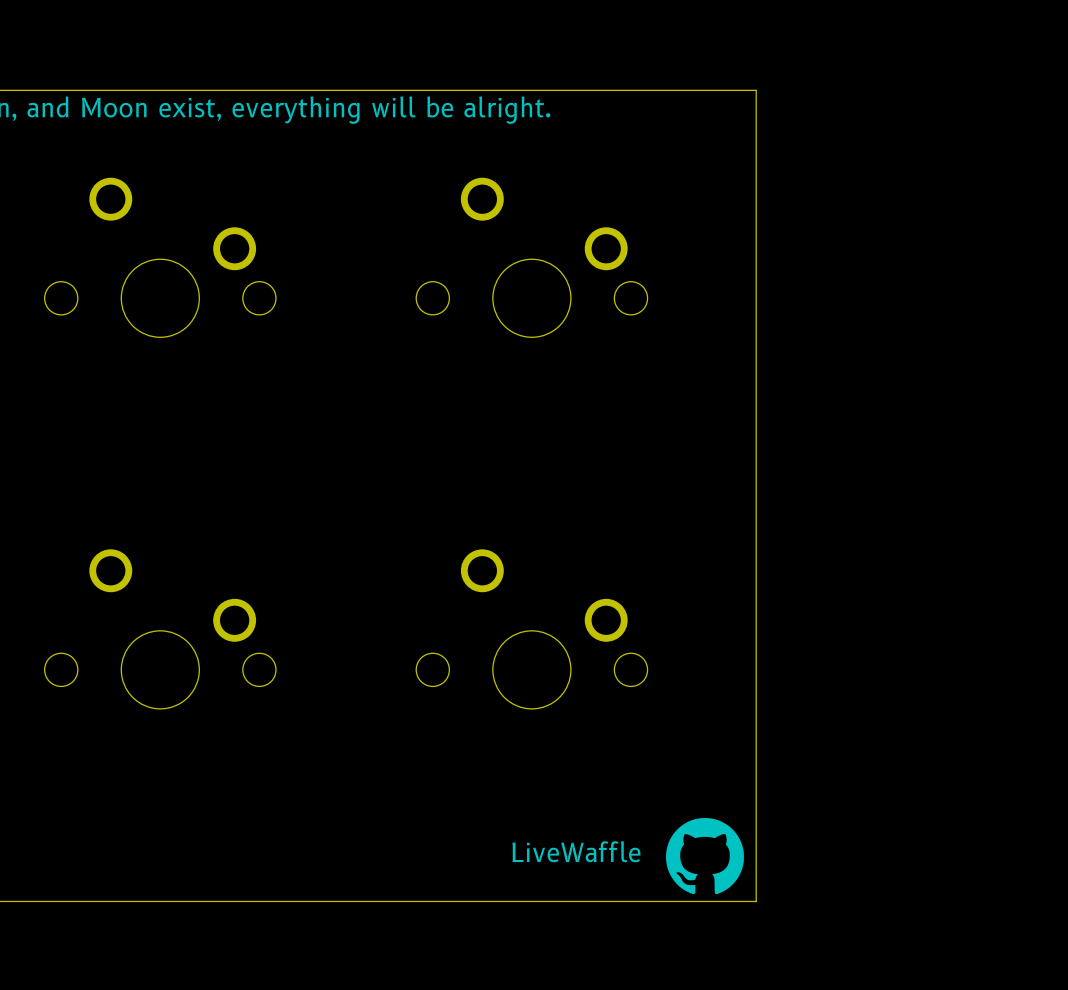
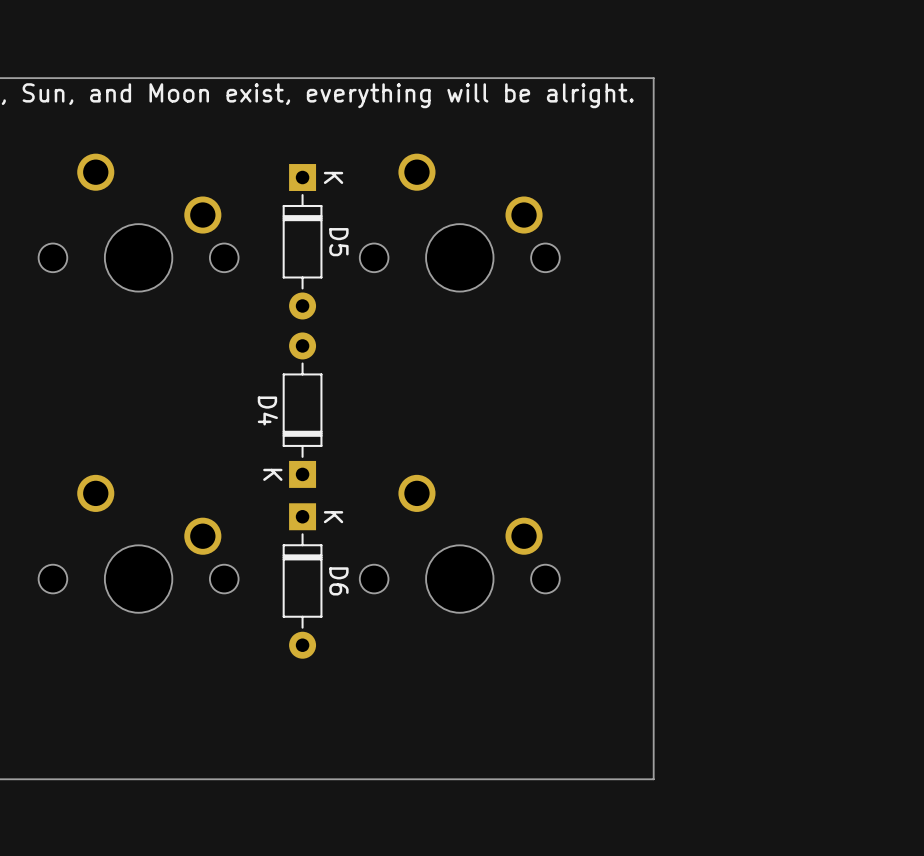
D5: none -> (302, 241)
D4: none -> (302, 410)
D6: none -> (302, 580)
drawing: [666, 818, 744, 895] -> none
text: LiveWaffle (576, 851) -> none

